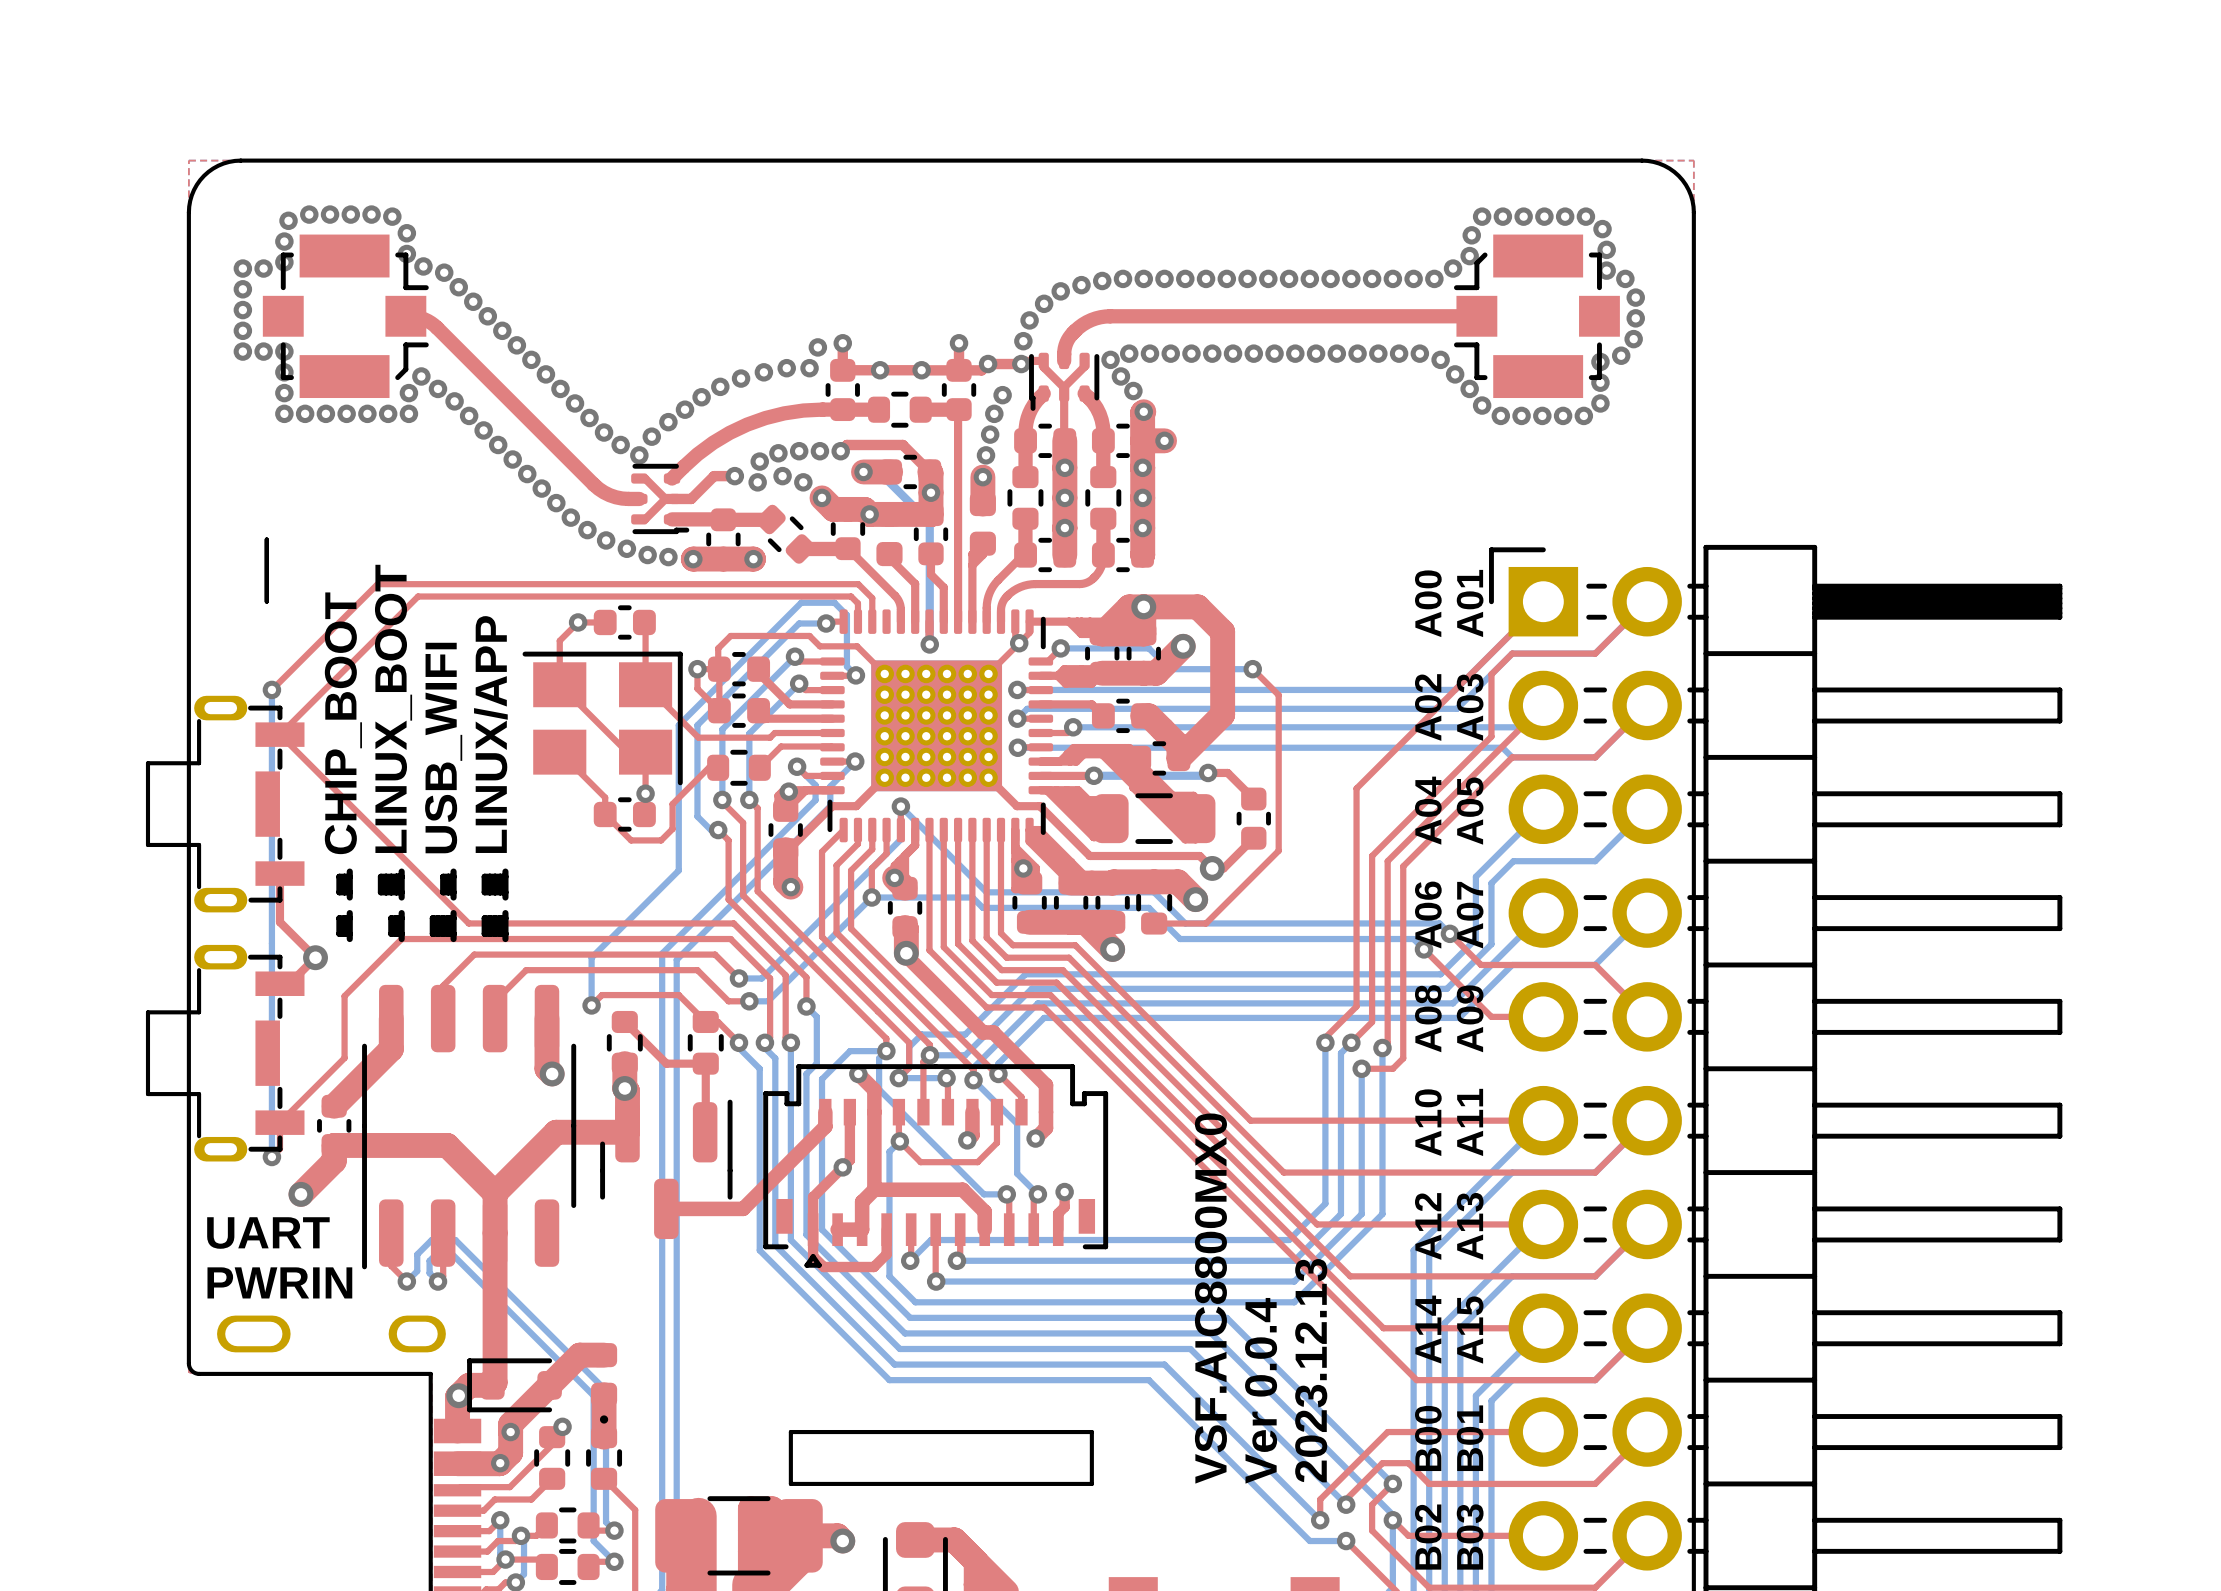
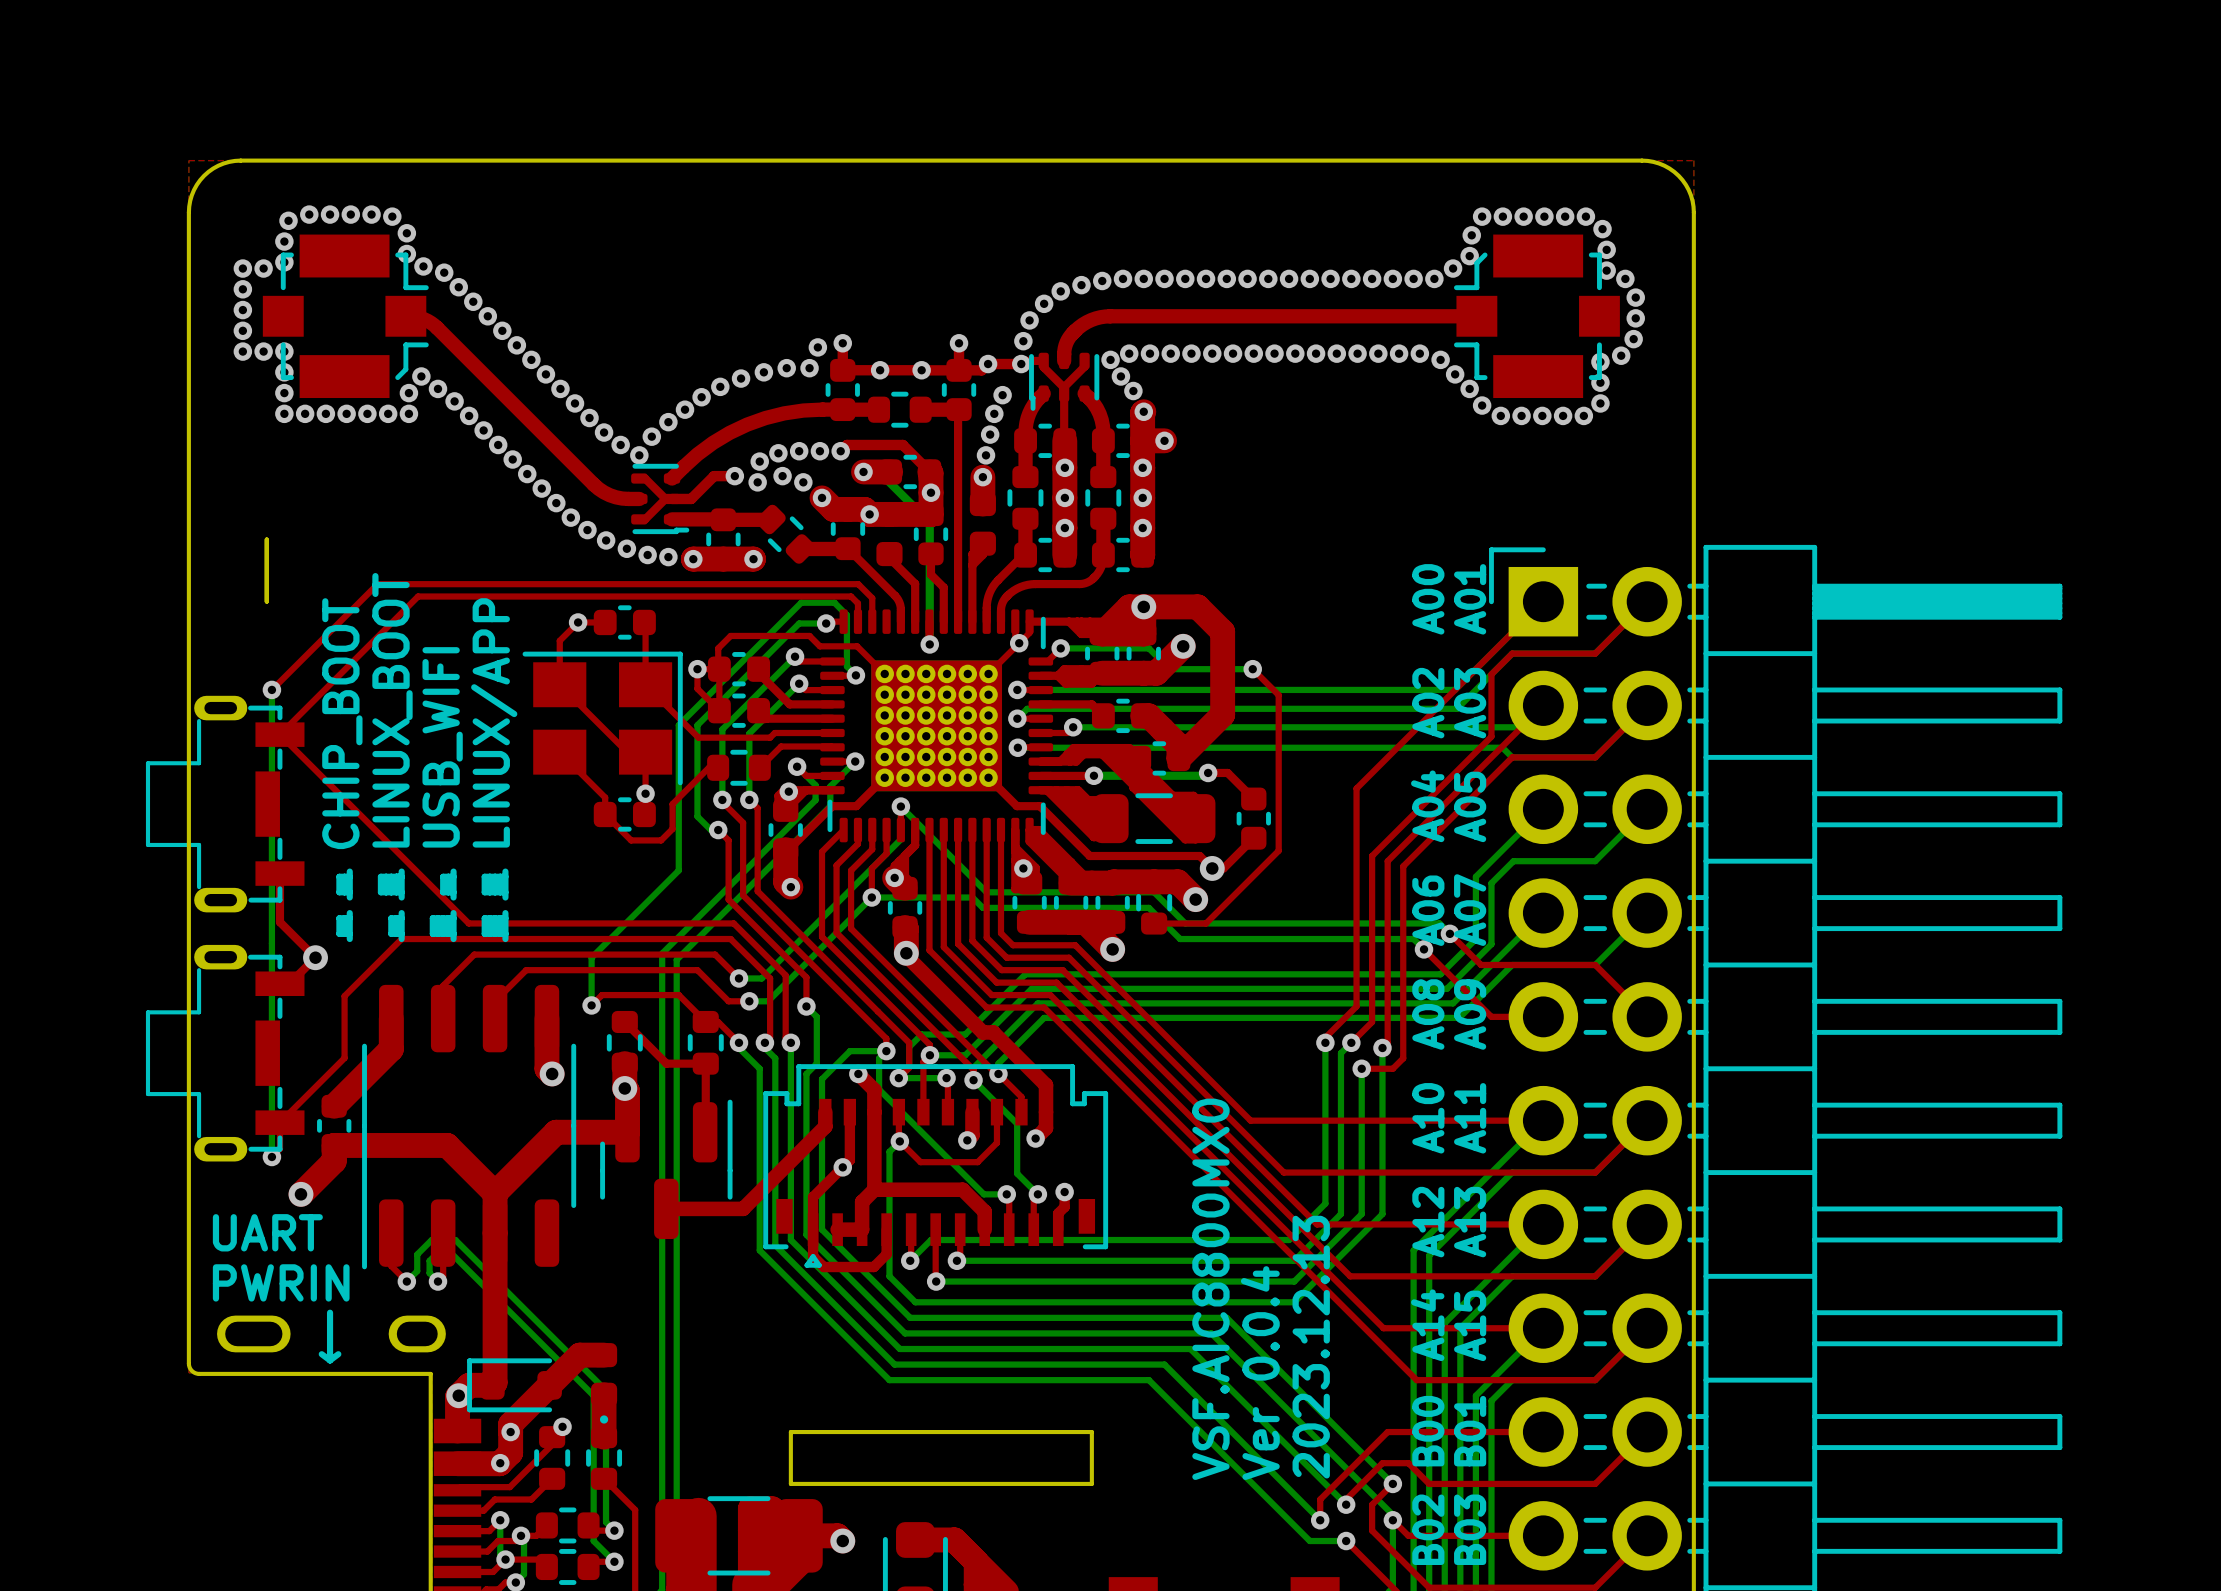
line: none -> (330, 1312) (330, 1360)
line: none -> (321, 1354) (330, 1360)
line: none -> (338, 1354) (330, 1360)

